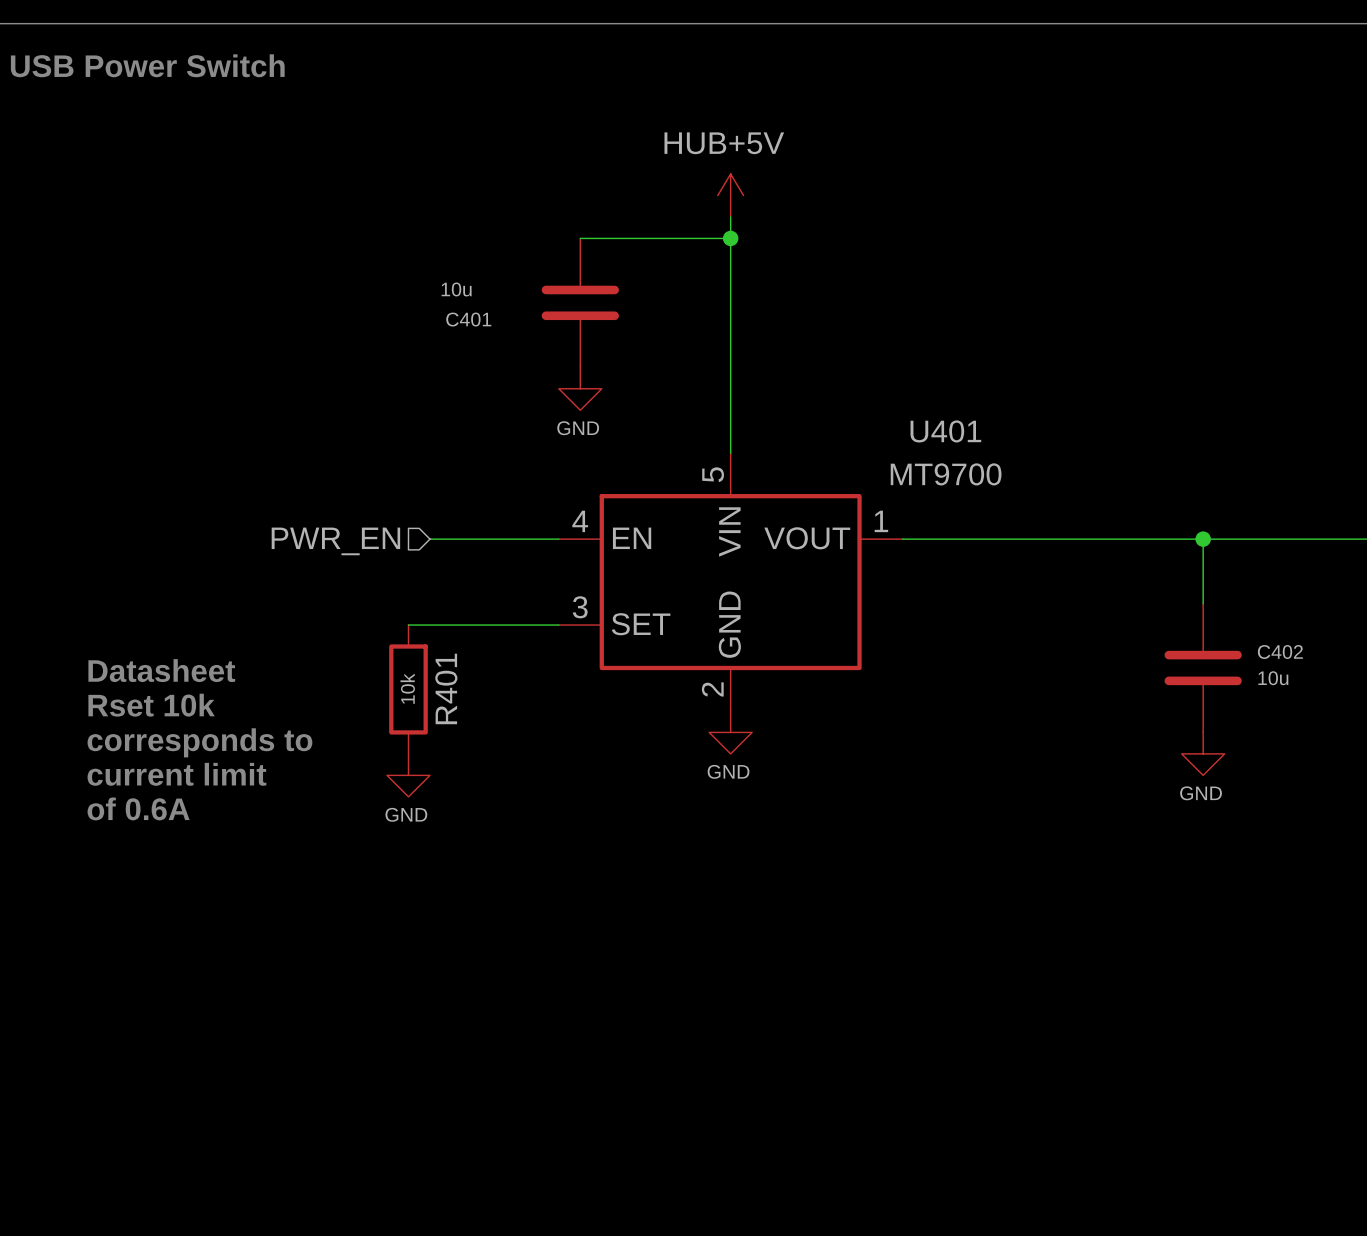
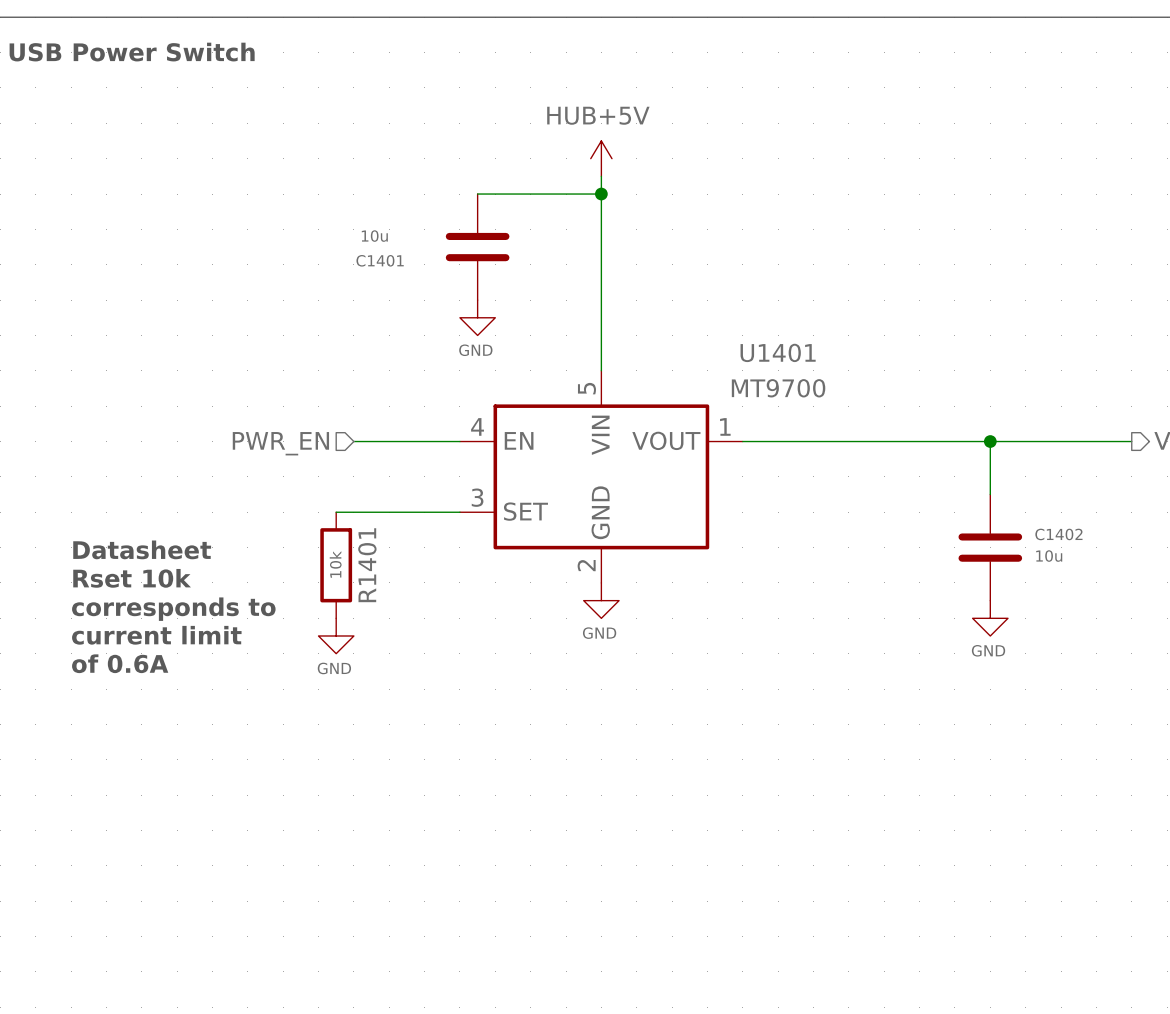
C401 name: C401 (468, 319) -> C1401 (380, 260)
U401 name: U401 (945, 431) -> U1401 (778, 352)
C402 name: C402 (1280, 652) -> C1402 (1058, 534)
R401 name: R401 (446, 688) -> R1401 (367, 565)

